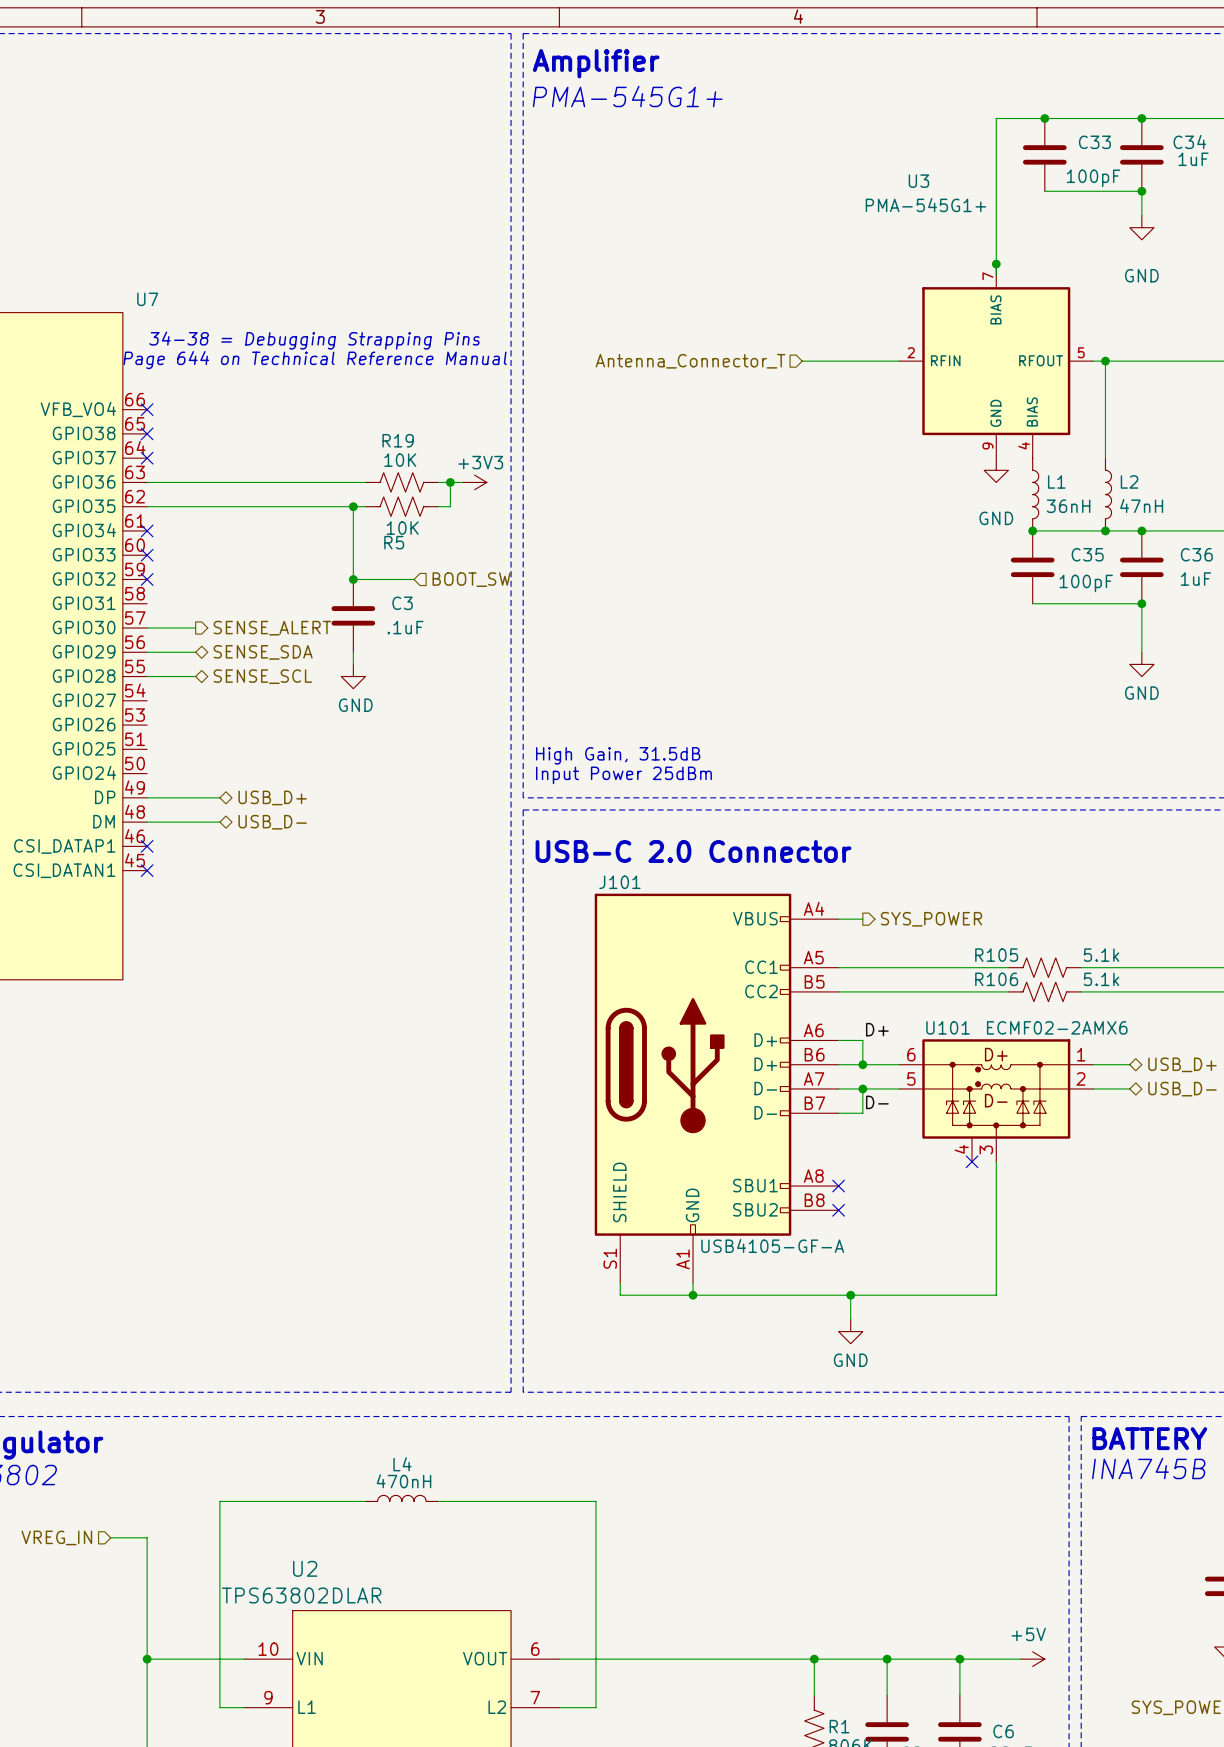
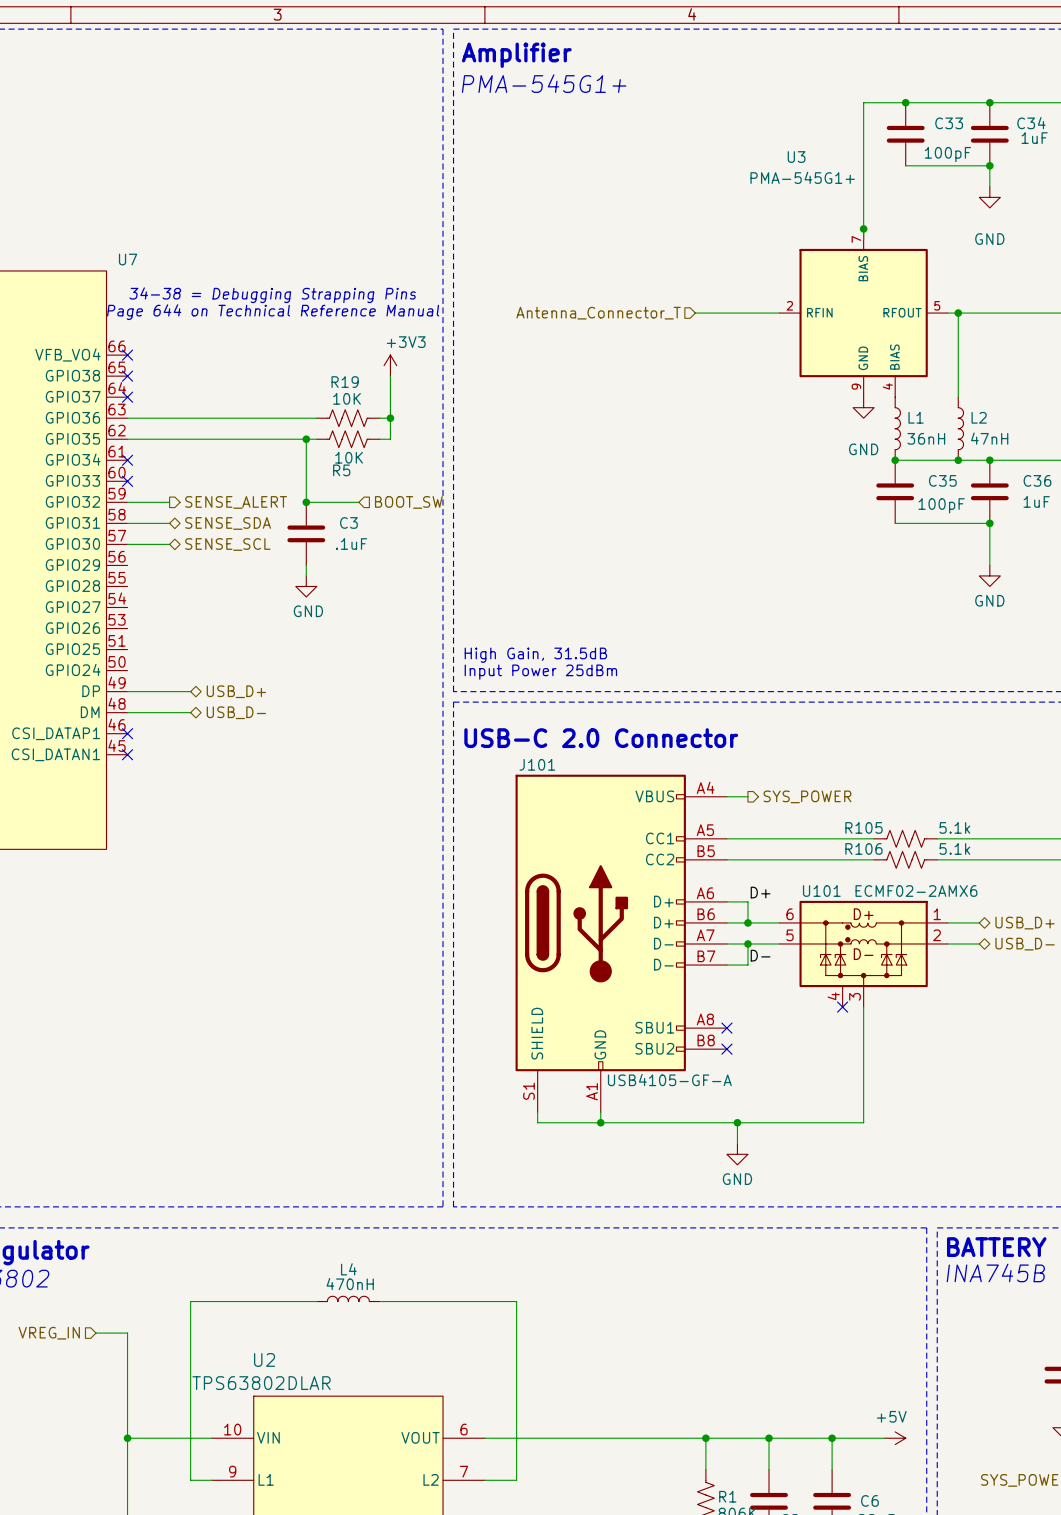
wire: (450, 482) (462, 482) -> (390, 418) (390, 376)
power symbol rotation: 0° (474, 482) -> 90° counterclockwise (390, 365)
power symbol position: +3V3 (474, 482) -> +3V3 (390, 365)
no-connect mark: (147, 579) -> none
hierarchical label: none -> SENSE_ALERT (236, 502)
hierarchical label shape: output (272, 628) -> bidirectional (227, 544)
hierarchical label: SENSE_ALERT (272, 628) -> SENSE_SCL (227, 544)
wire: (147, 652) (195, 652) -> (127, 502) (169, 502)
hierarchical label position: SENSE_SDA (263, 652) -> SENSE_SDA (228, 523)
wire: (147, 676) (195, 676) -> (127, 523) (169, 523)
hierarchical label: SENSE_SCL (262, 676) -> none

